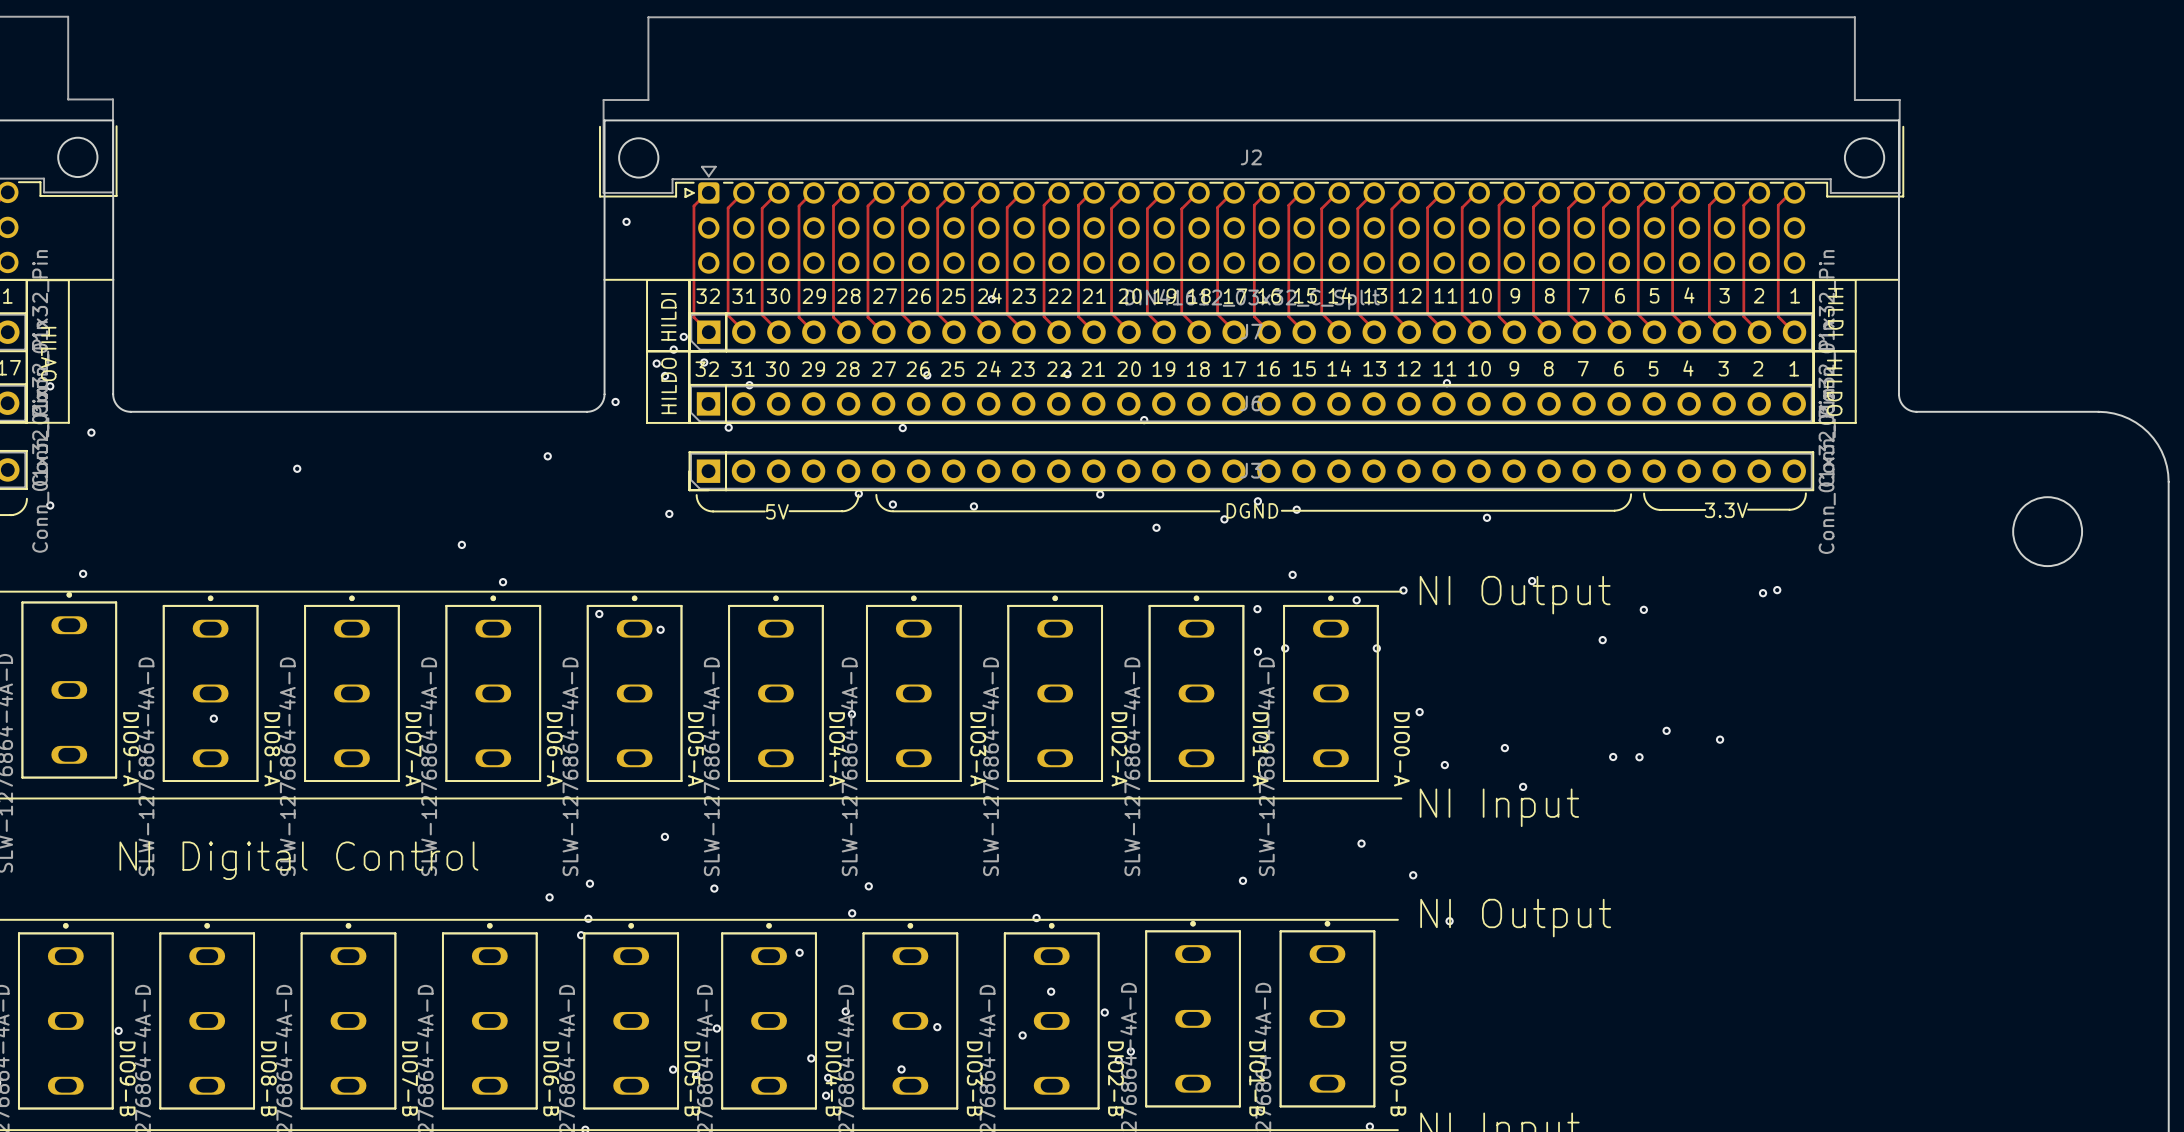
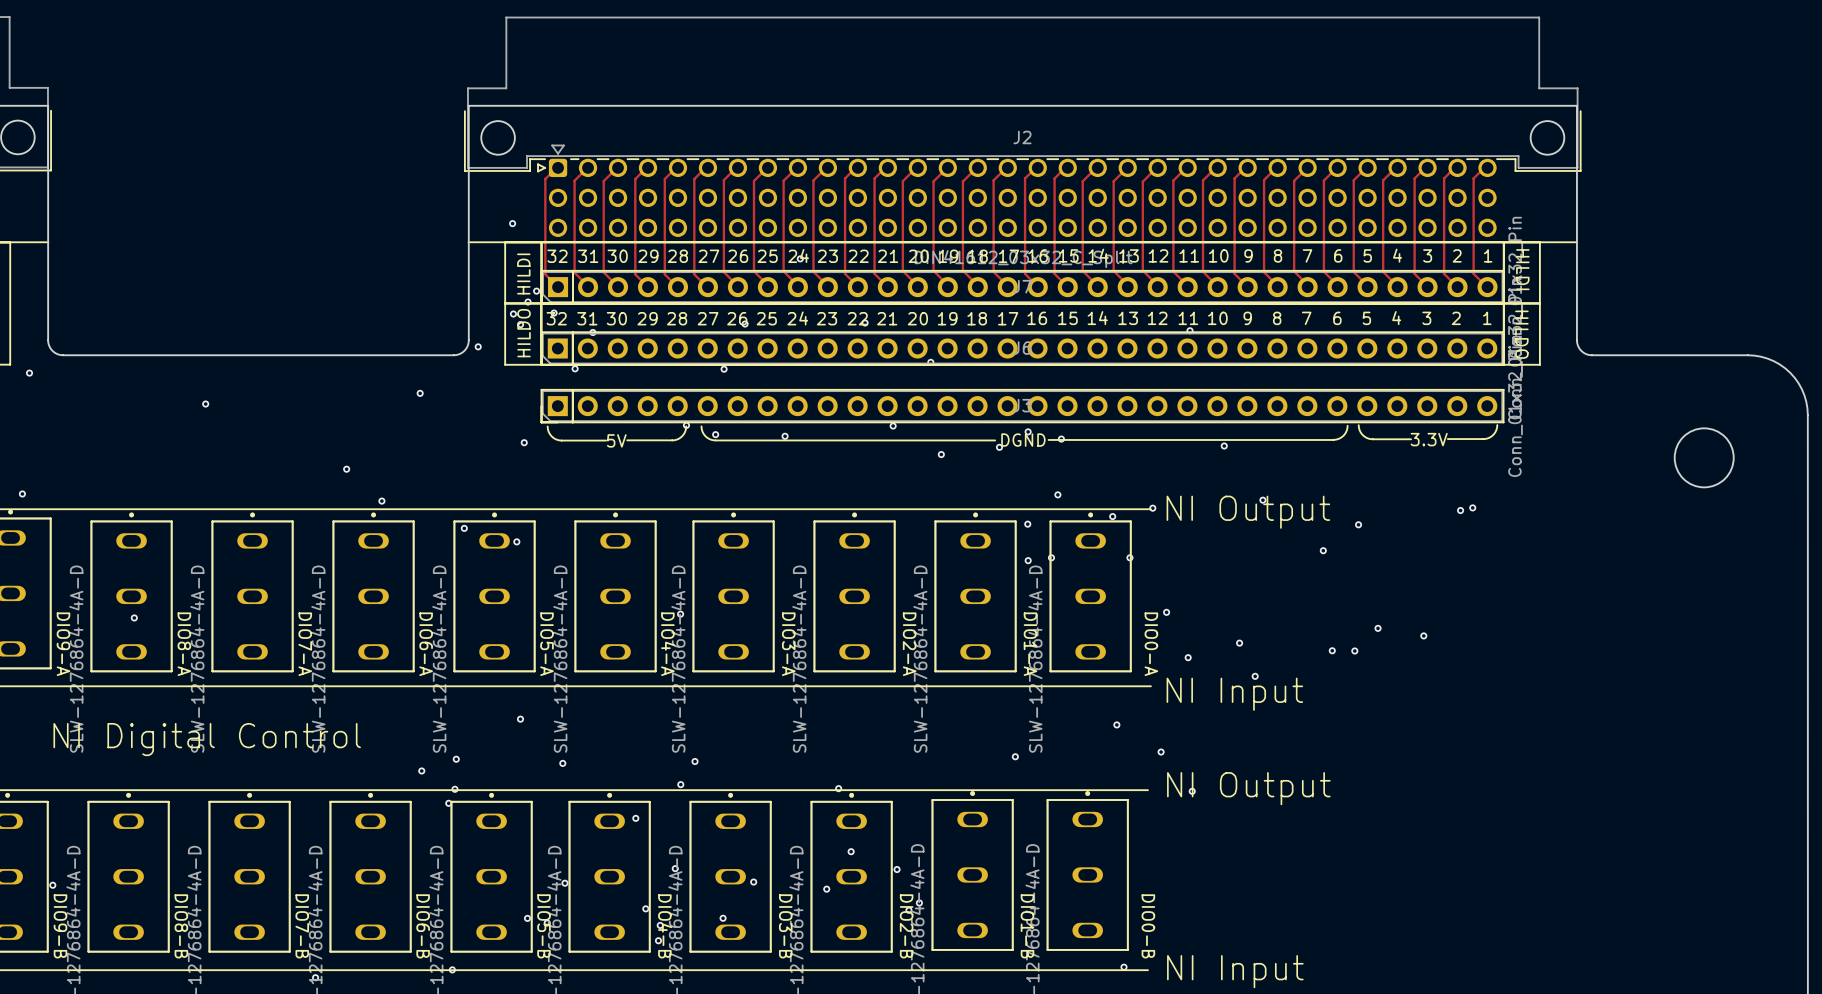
via position: (626, 221) -> (512, 223)

